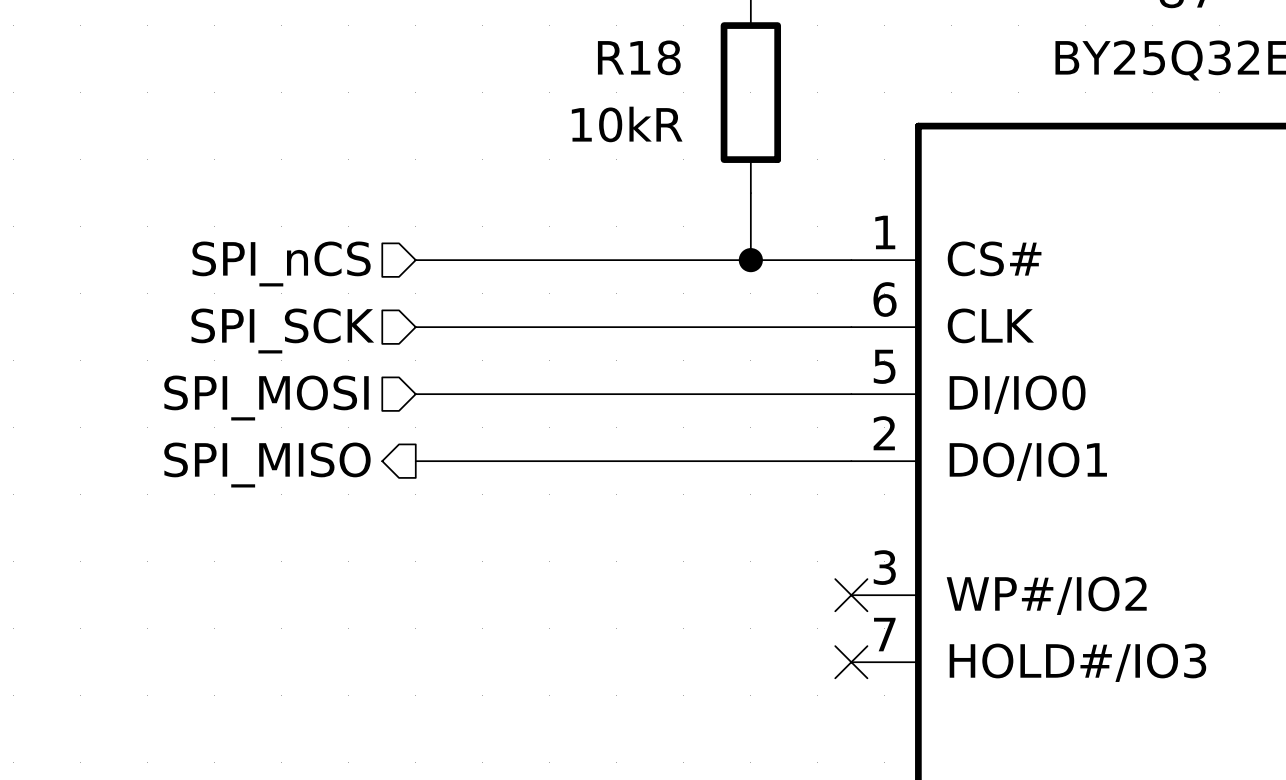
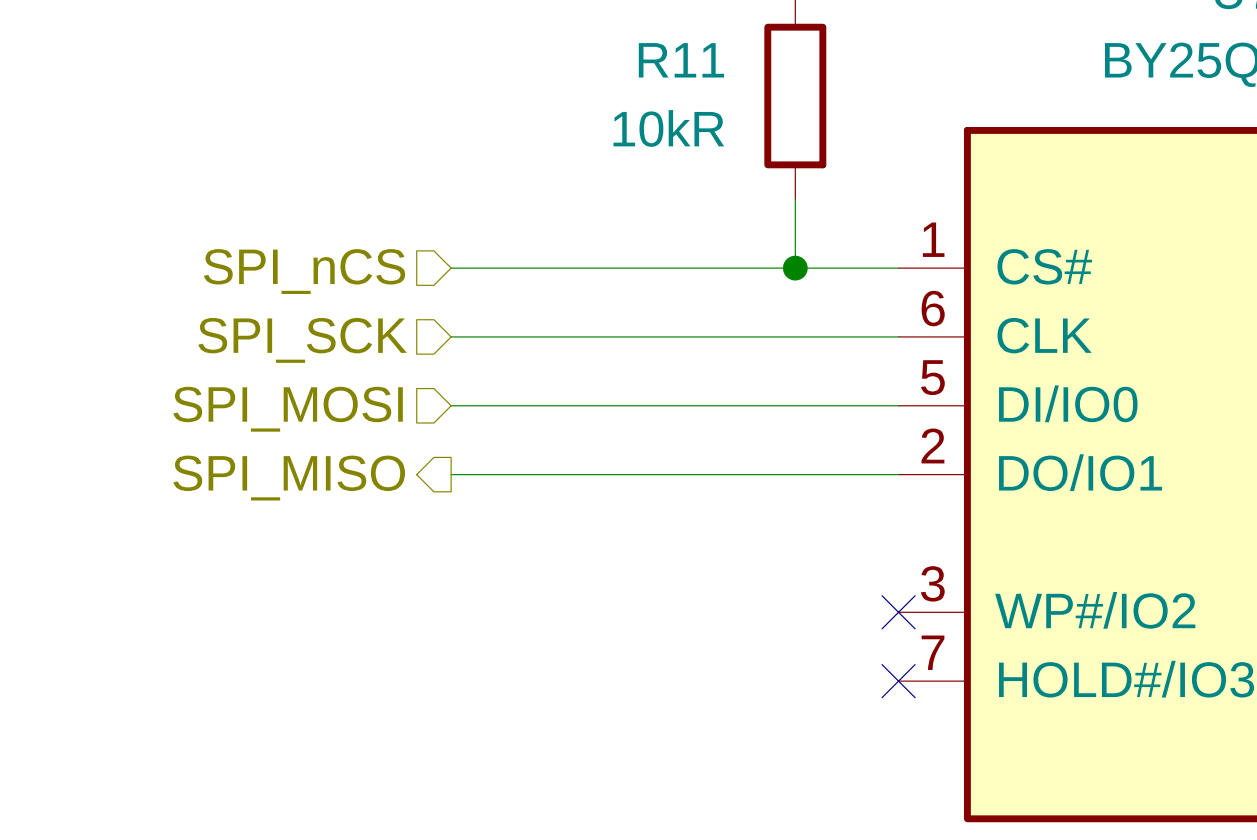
R18 name: R18 (639, 57) -> R11 (681, 60)

